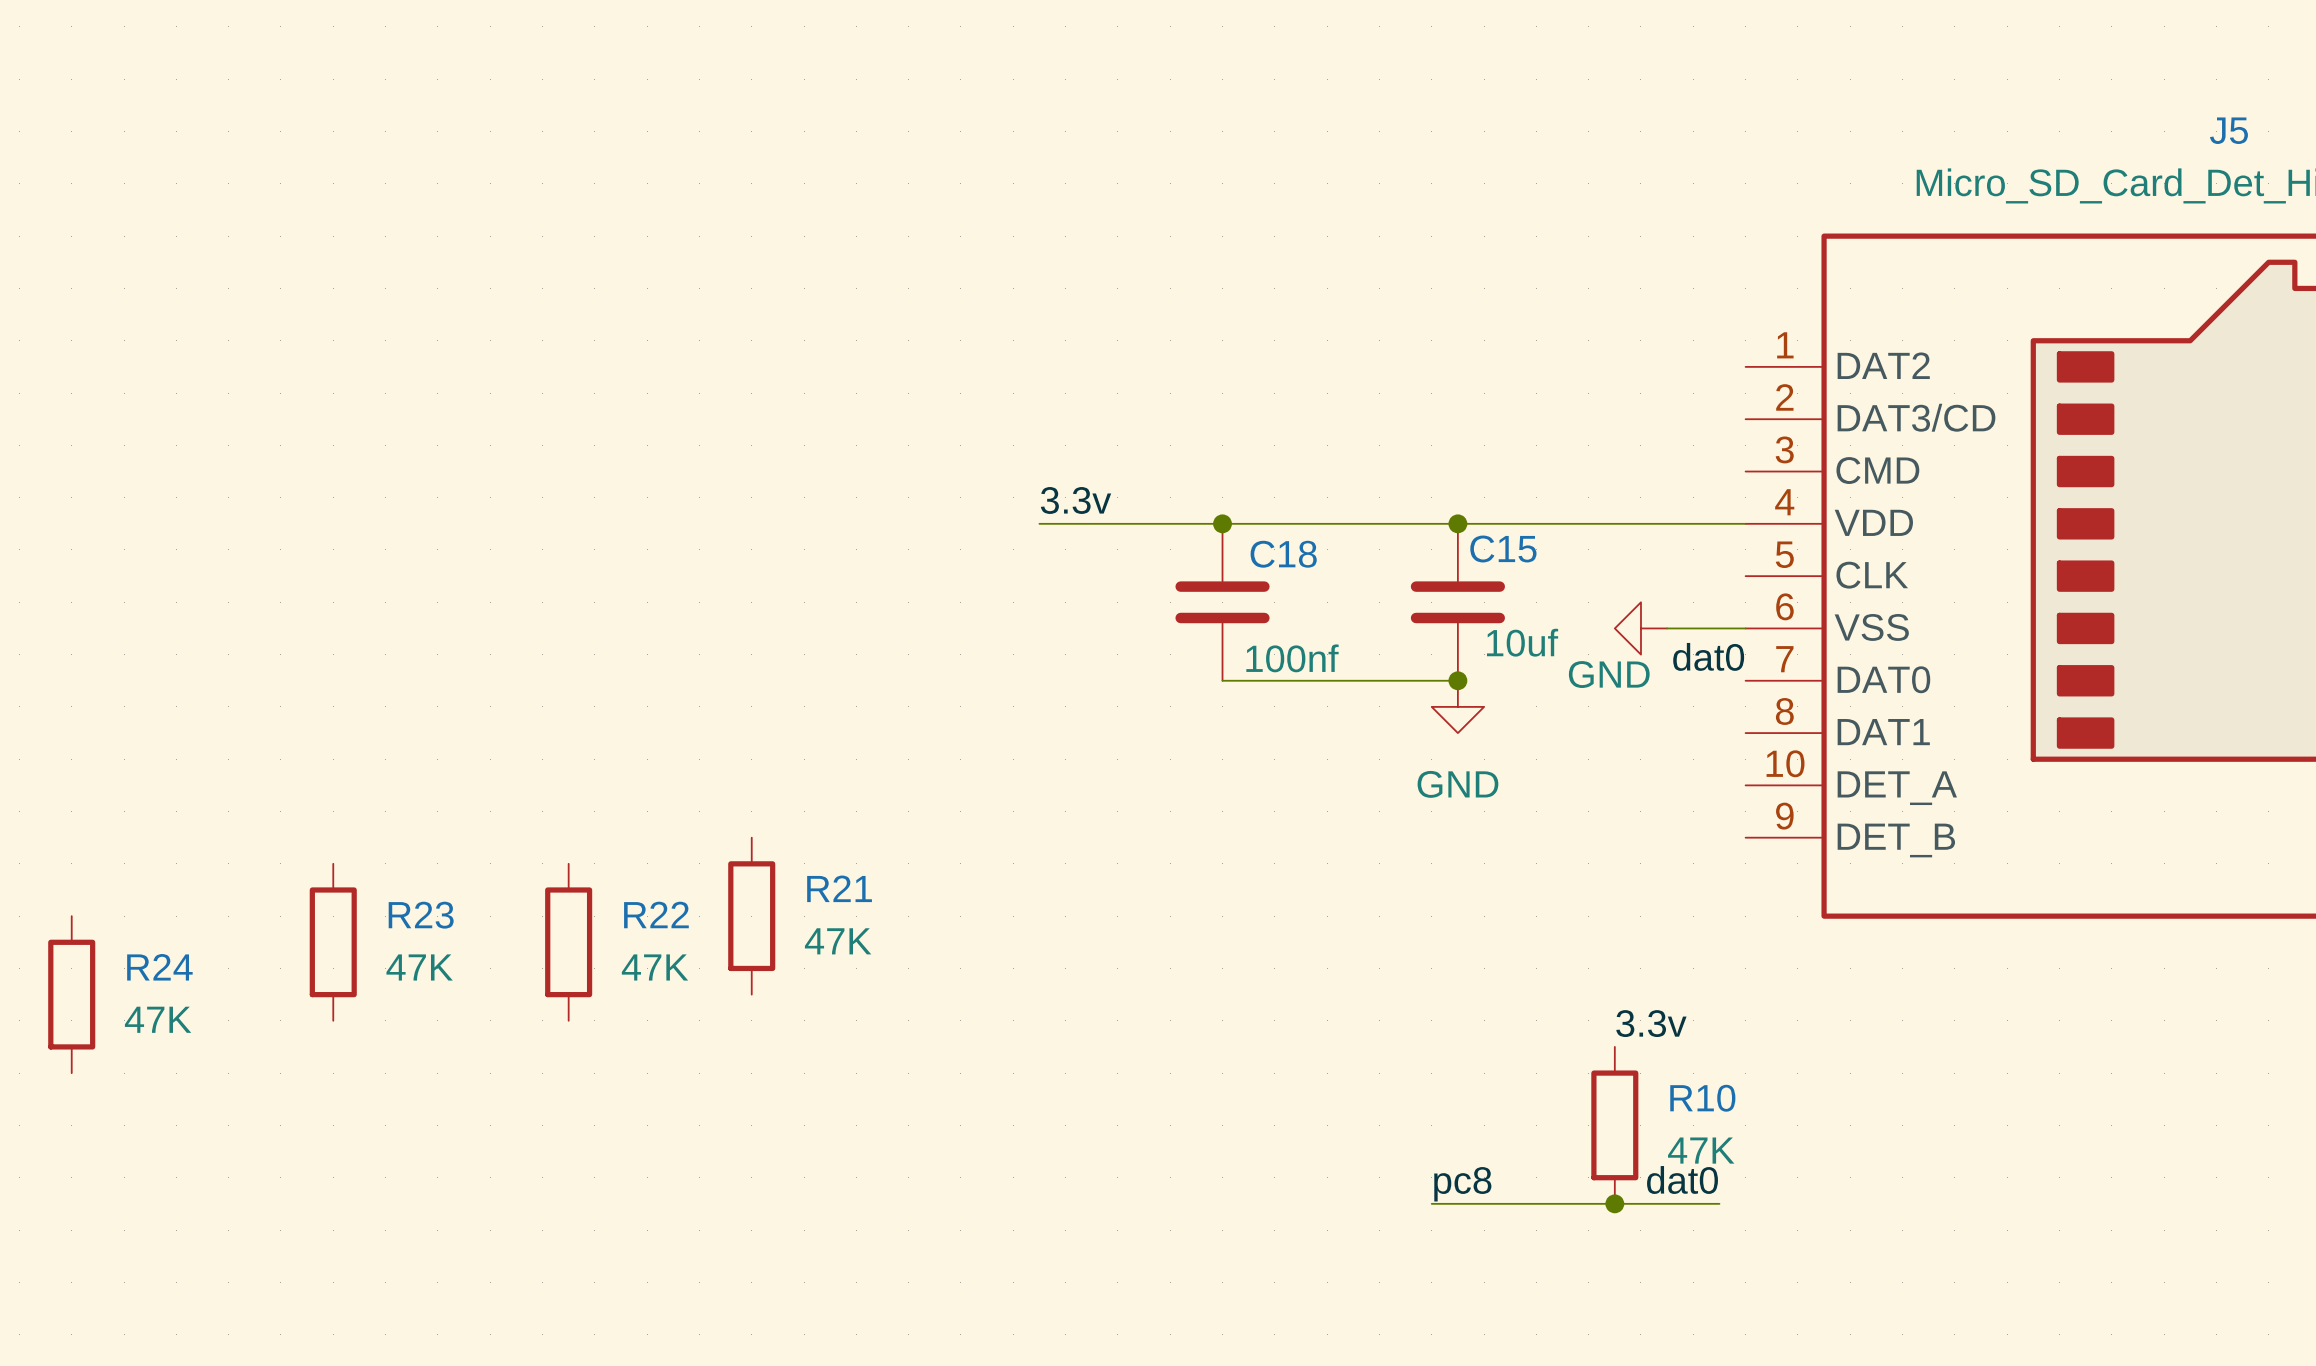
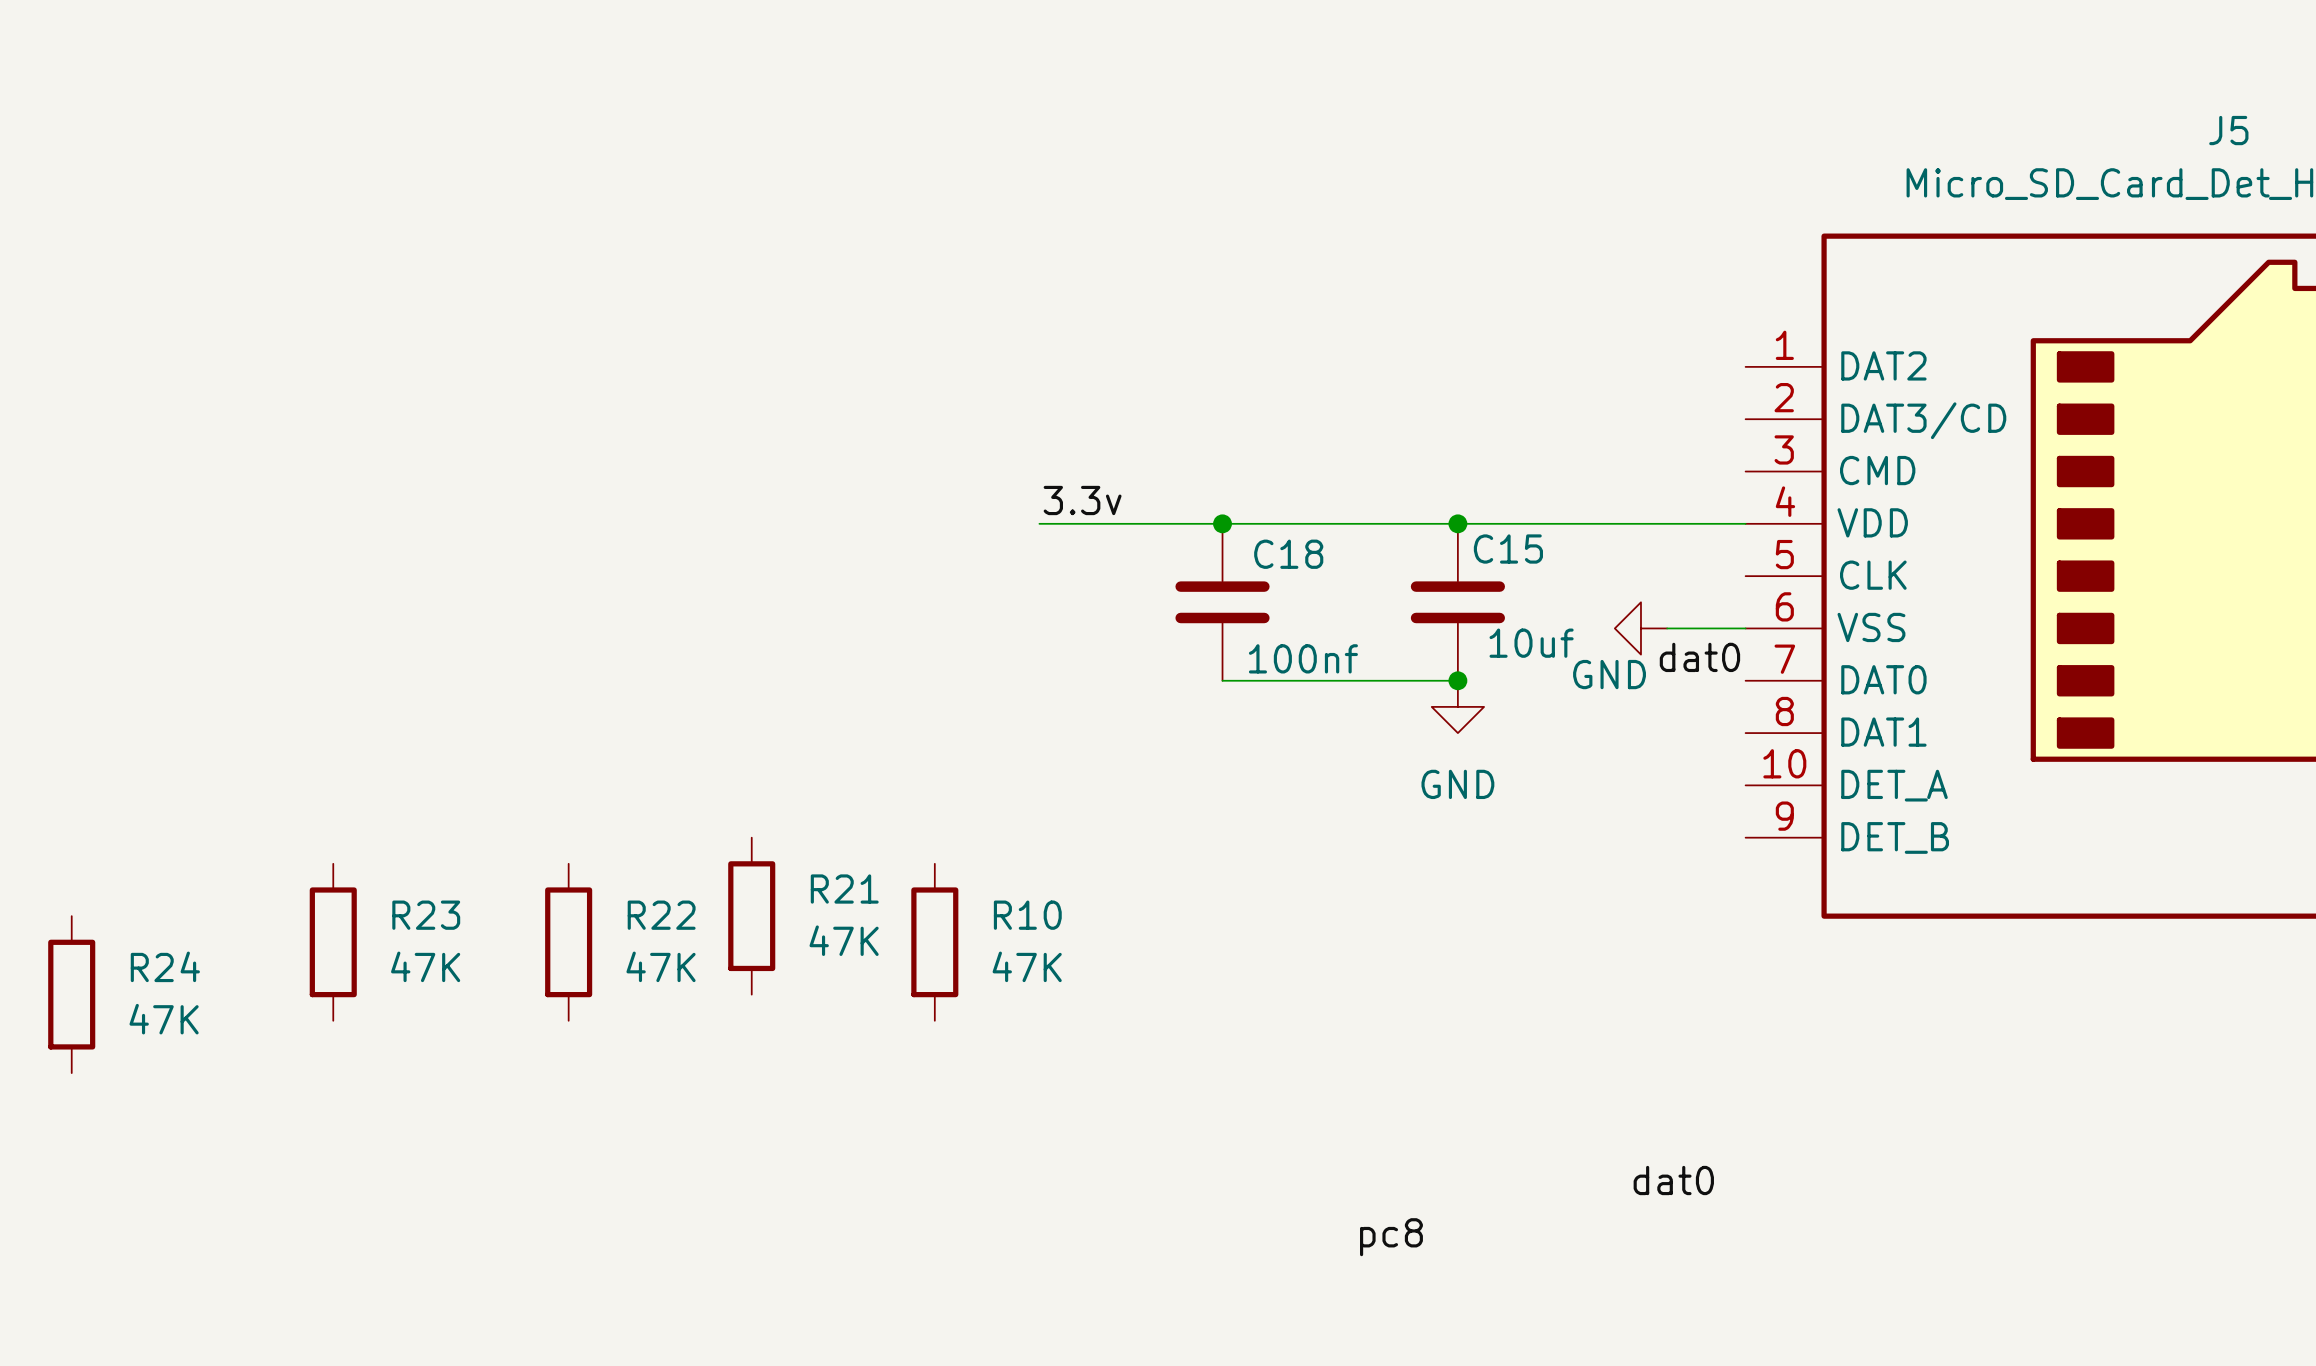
label: 3.3v (1651, 1023) -> none
R10 position: (1614, 1125) -> (934, 942)
label position: pc8 (1462, 1184) -> pc8 (1391, 1237)
wire: (1431, 1203) (1719, 1203) -> none
junction: (1614, 1203) -> none

